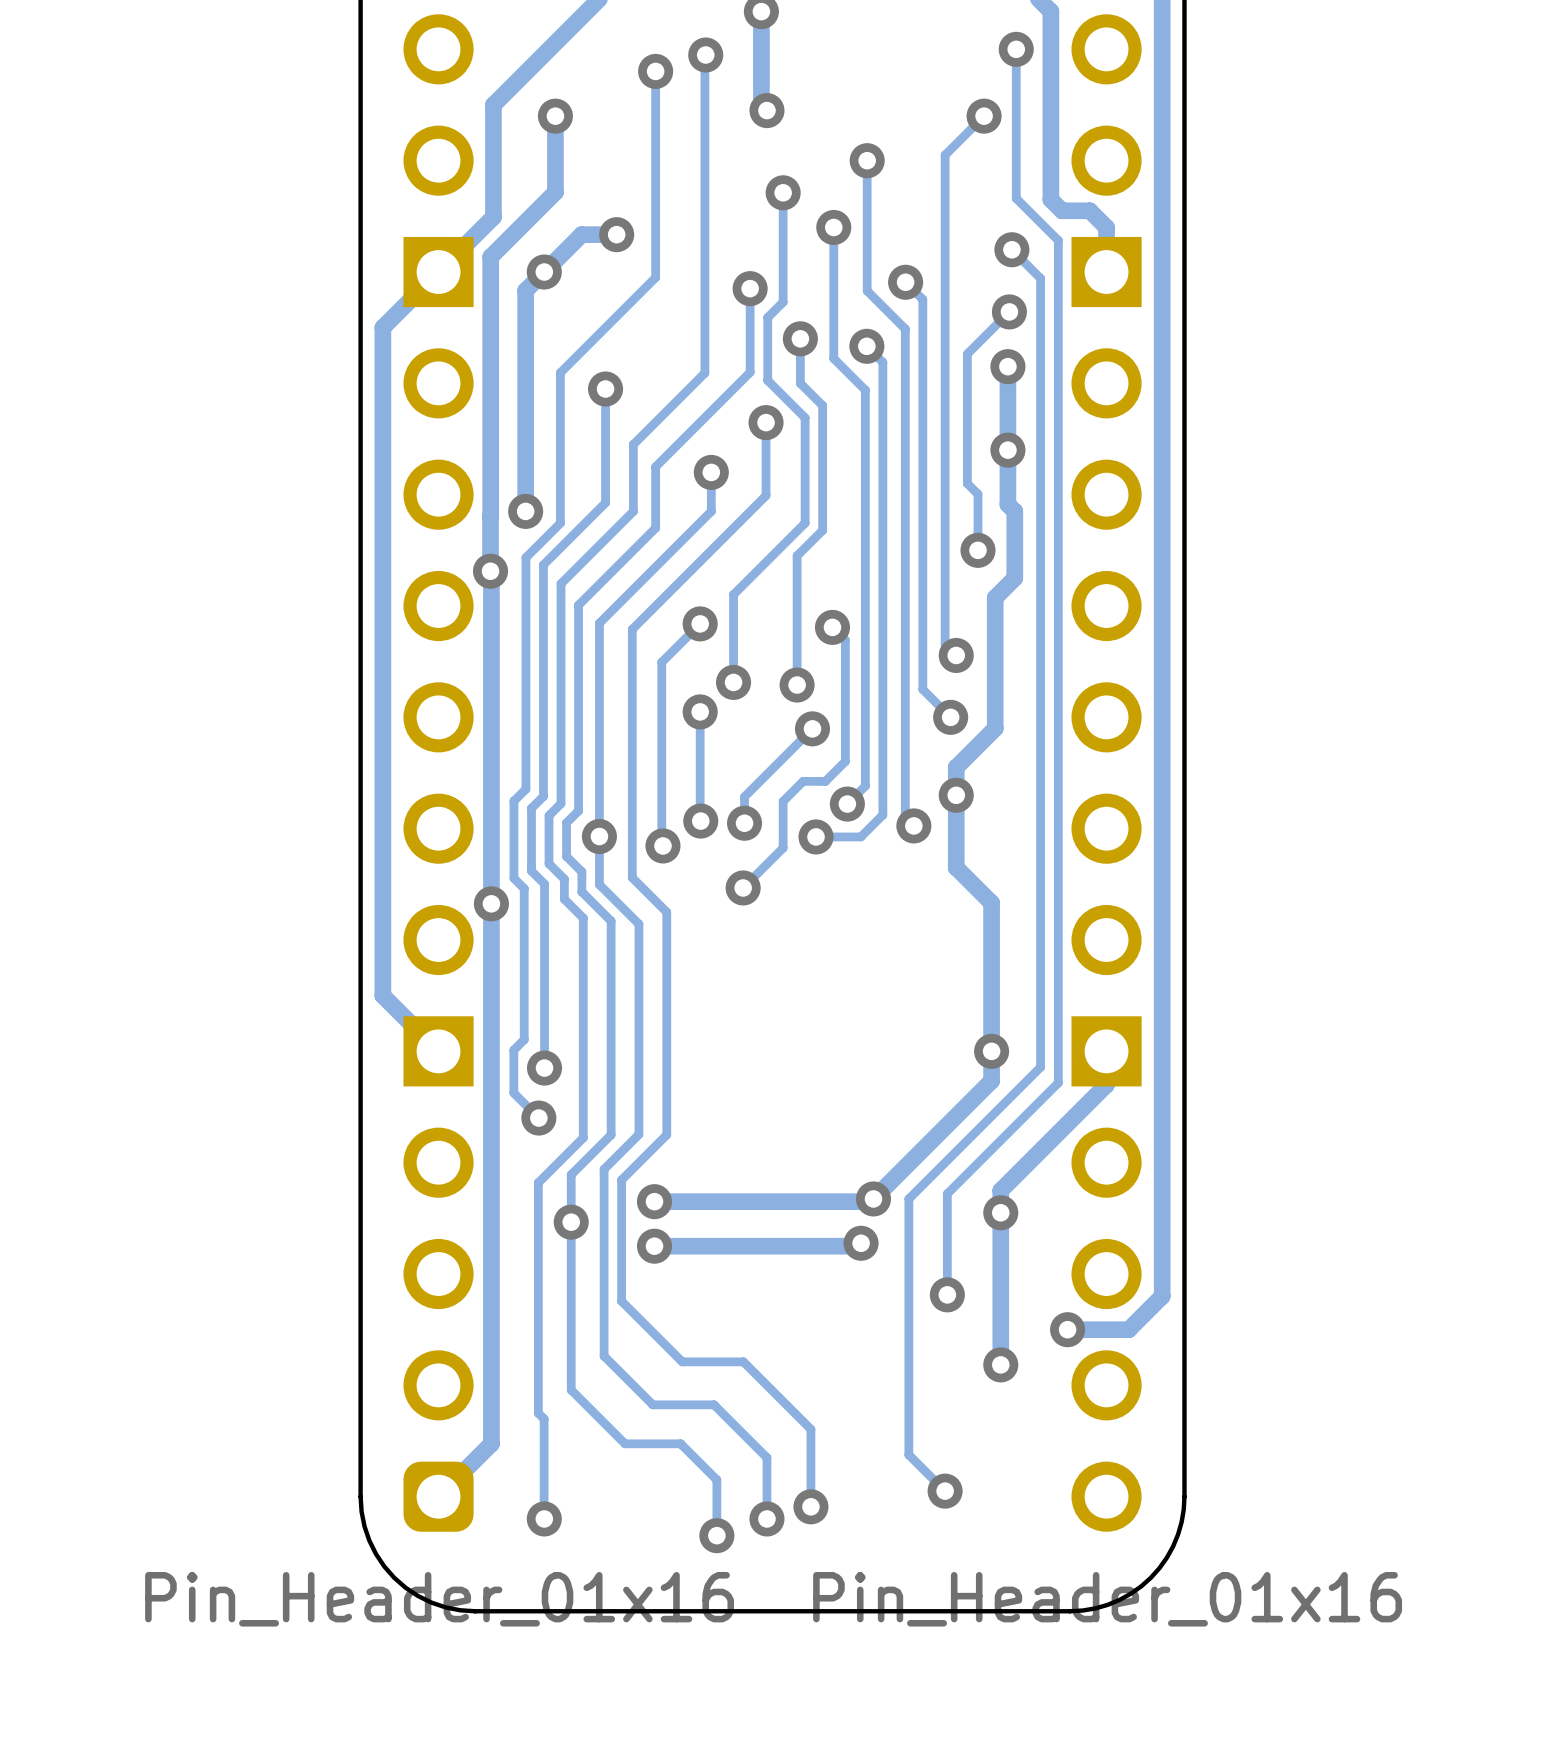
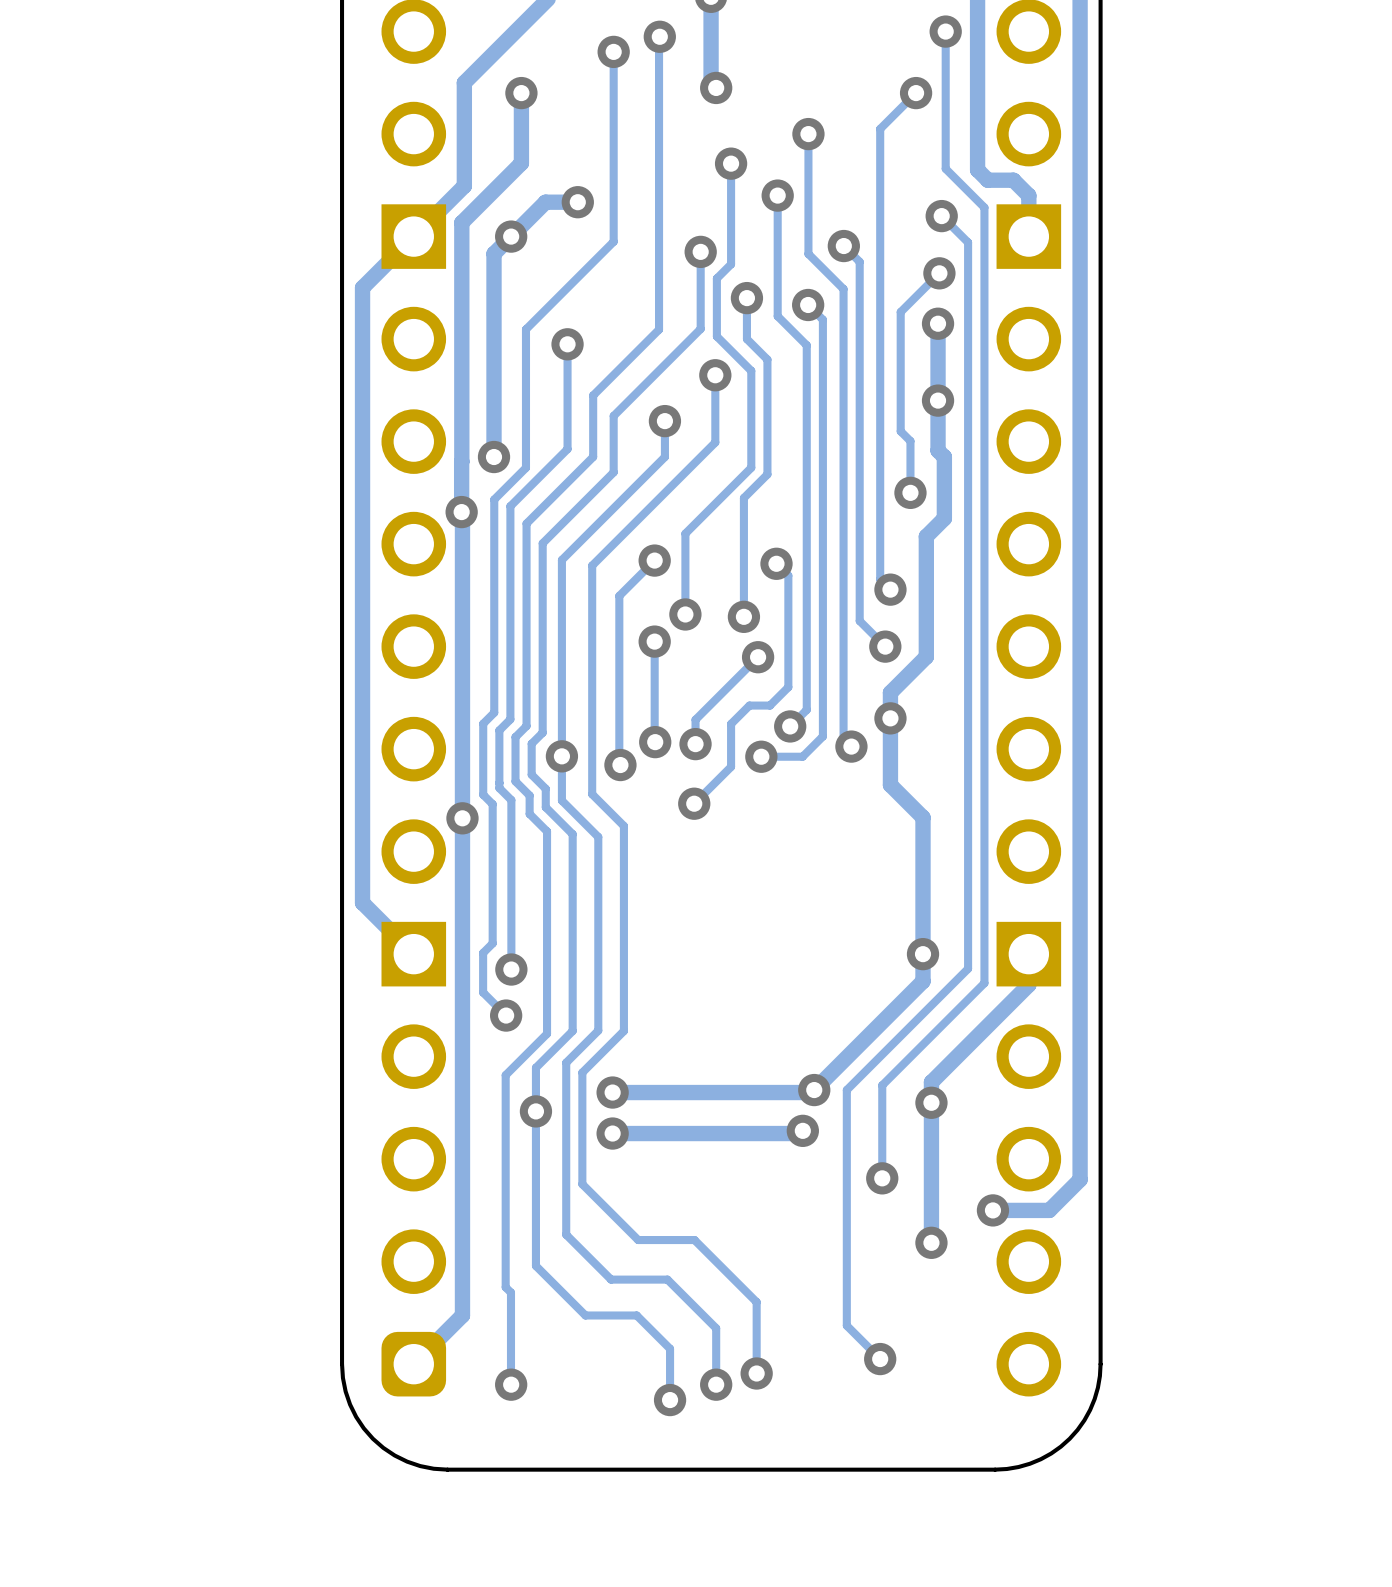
drawing: [145, 1571, 1403, 1627] -> none

